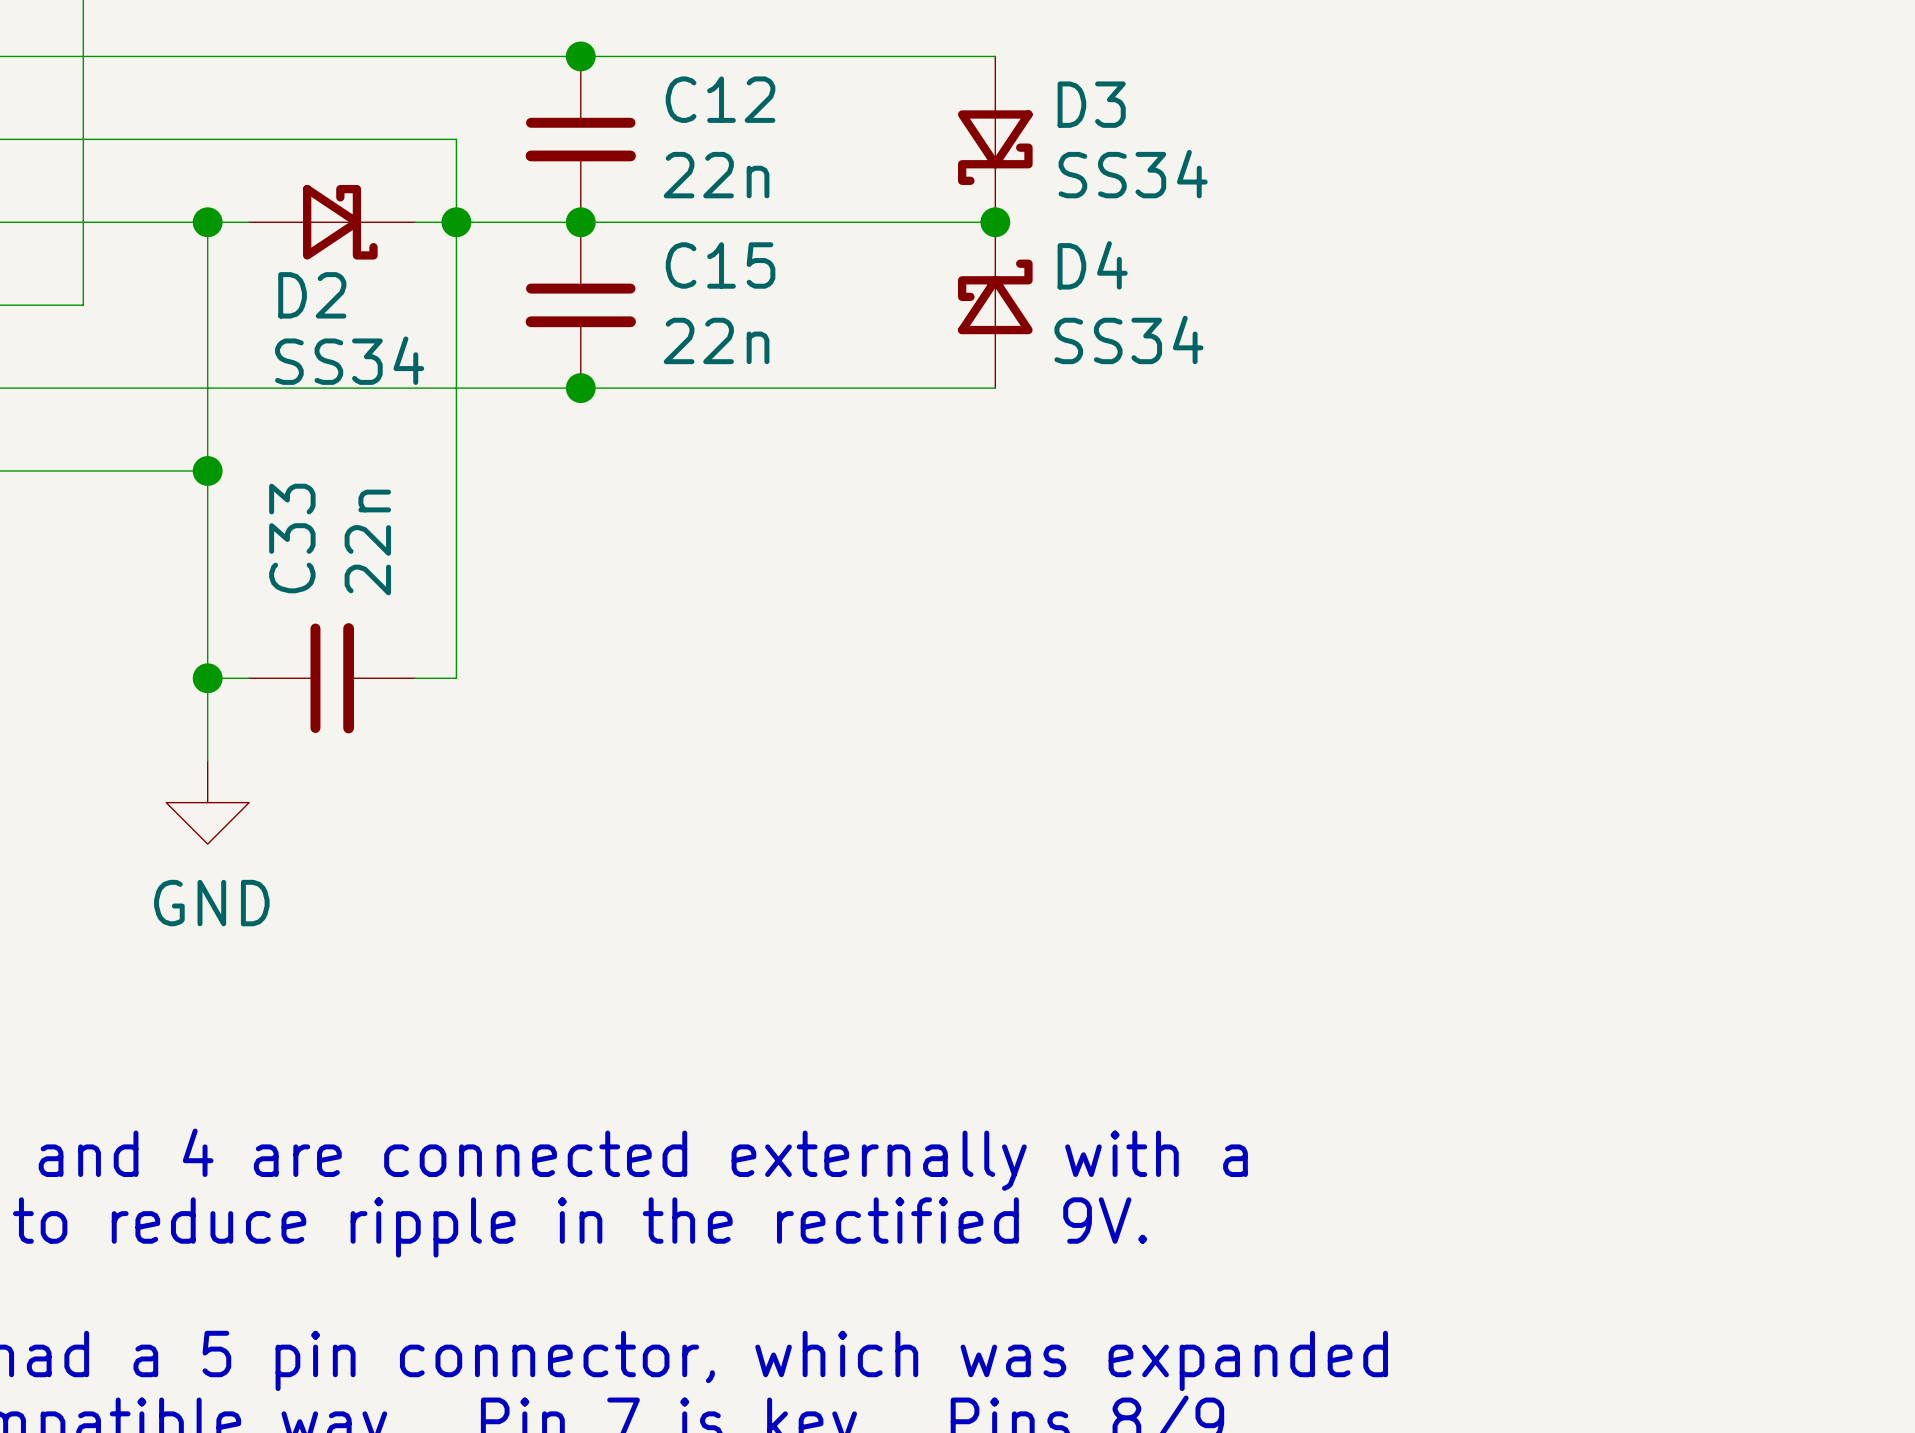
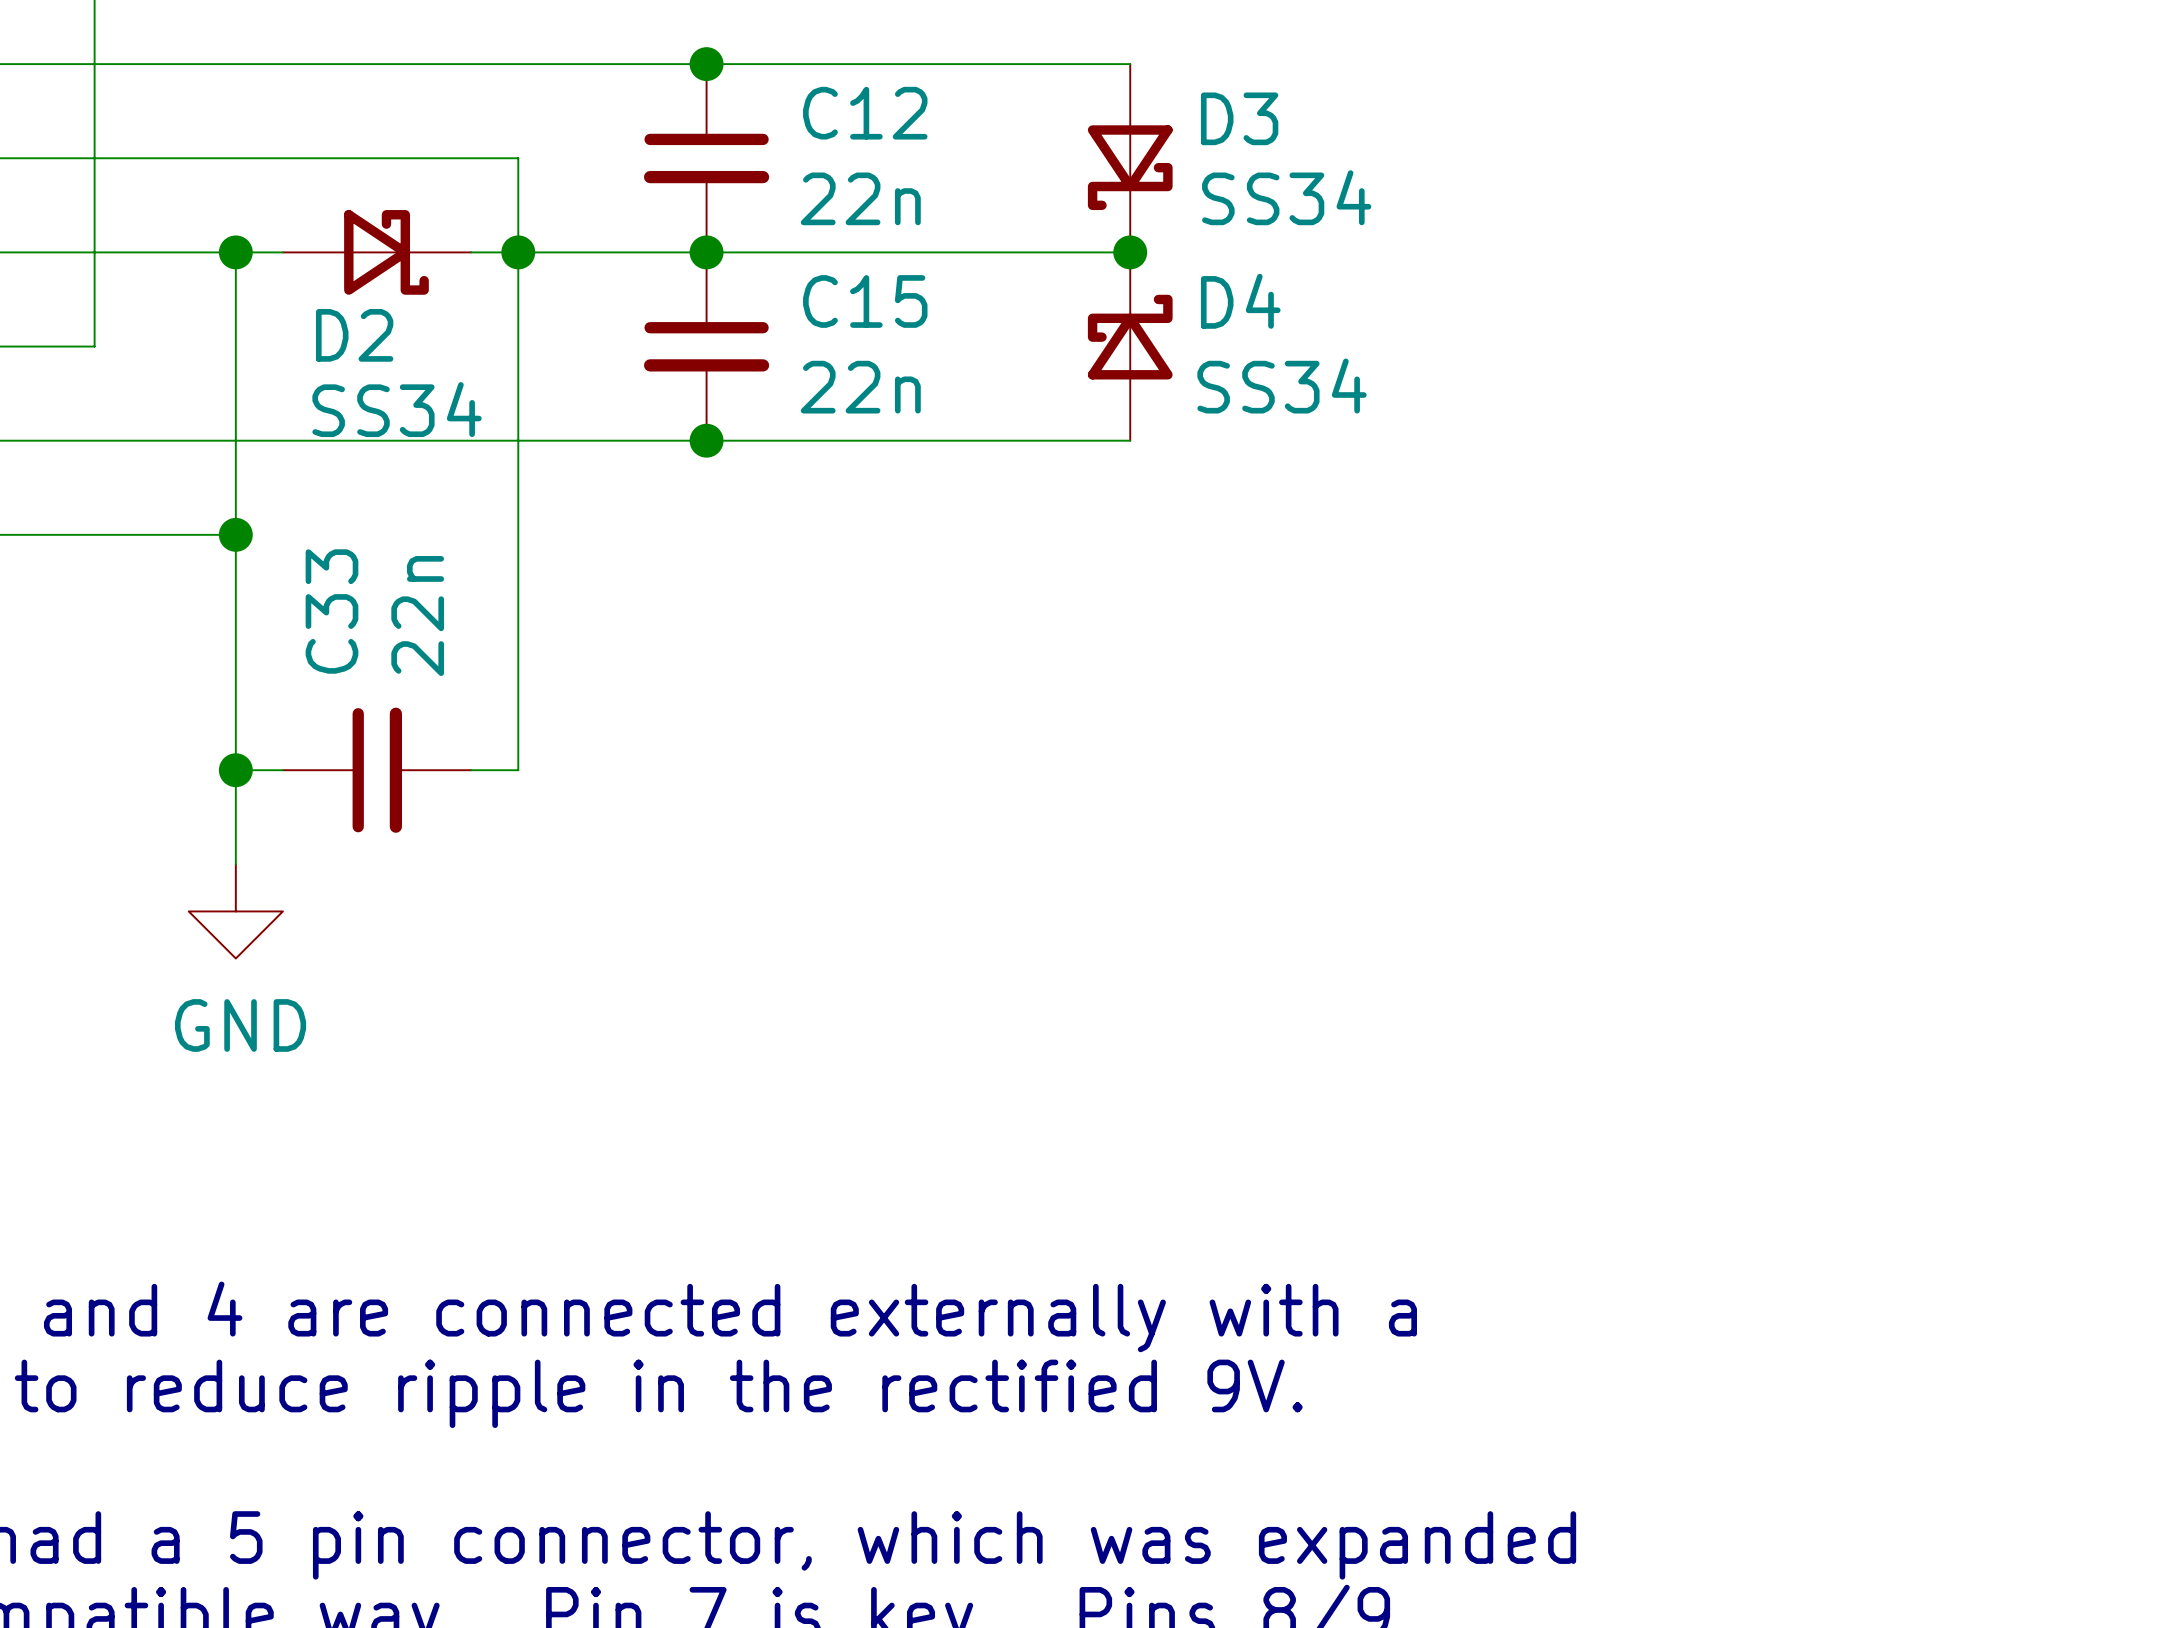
junction position: (580, 56) -> (706, 64)
C12 position: (580, 139) -> (706, 158)
junction position: (580, 222) -> (706, 252)
C15 position: (580, 305) -> (706, 346)
junction position: (580, 388) -> (706, 440)

